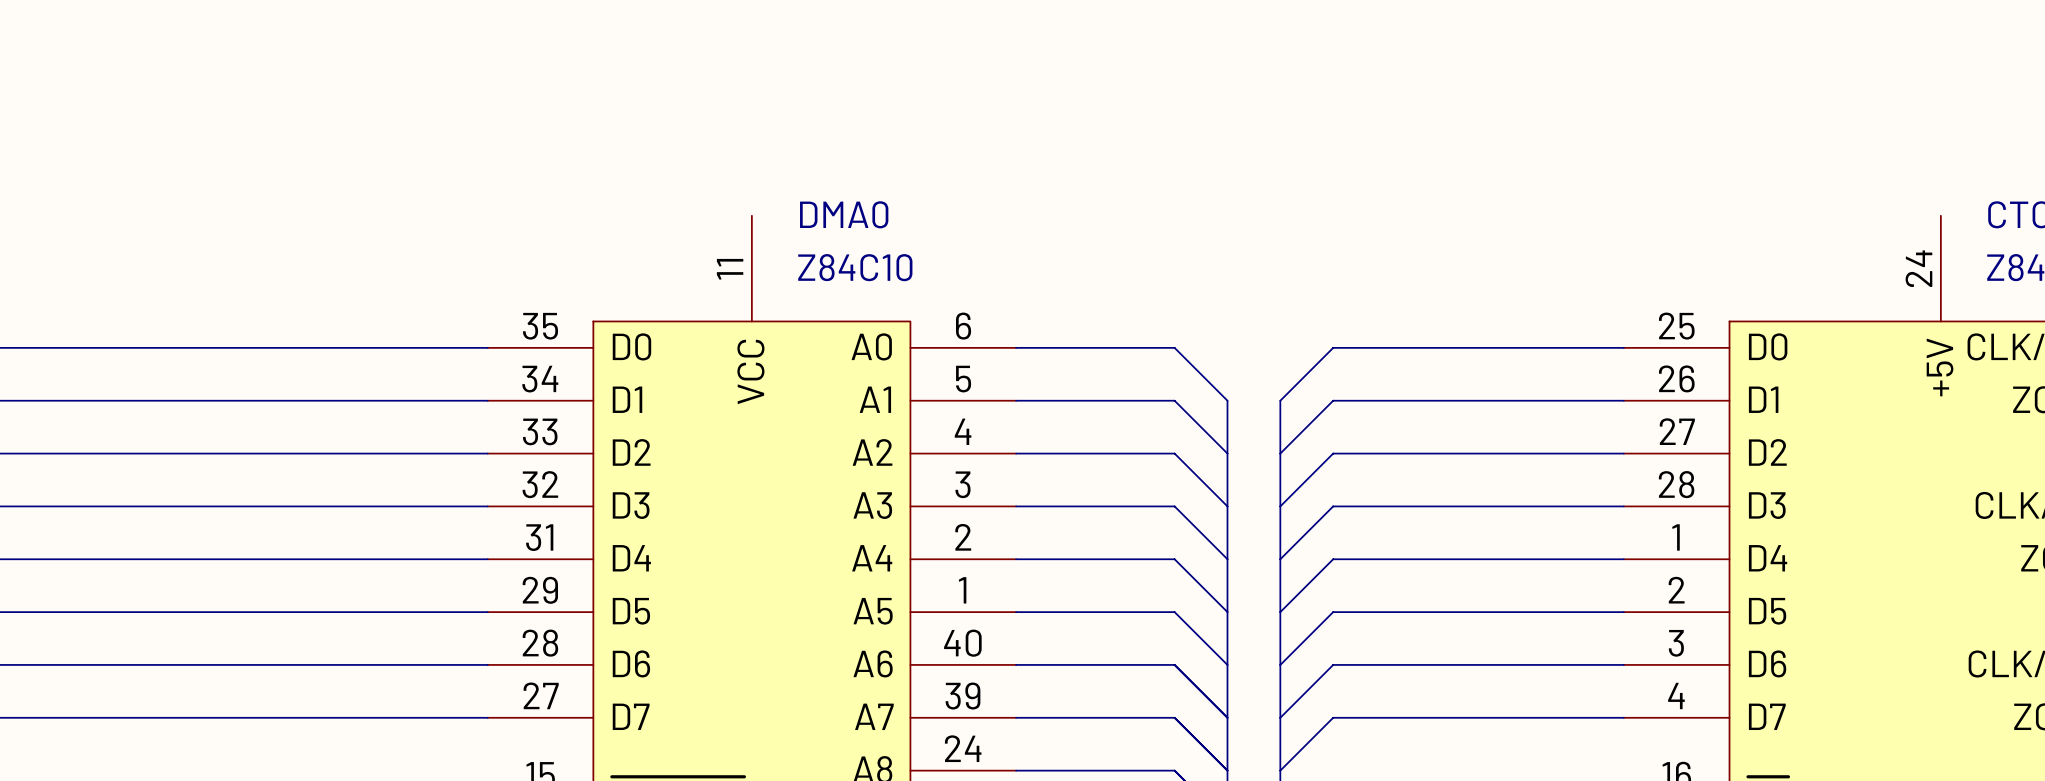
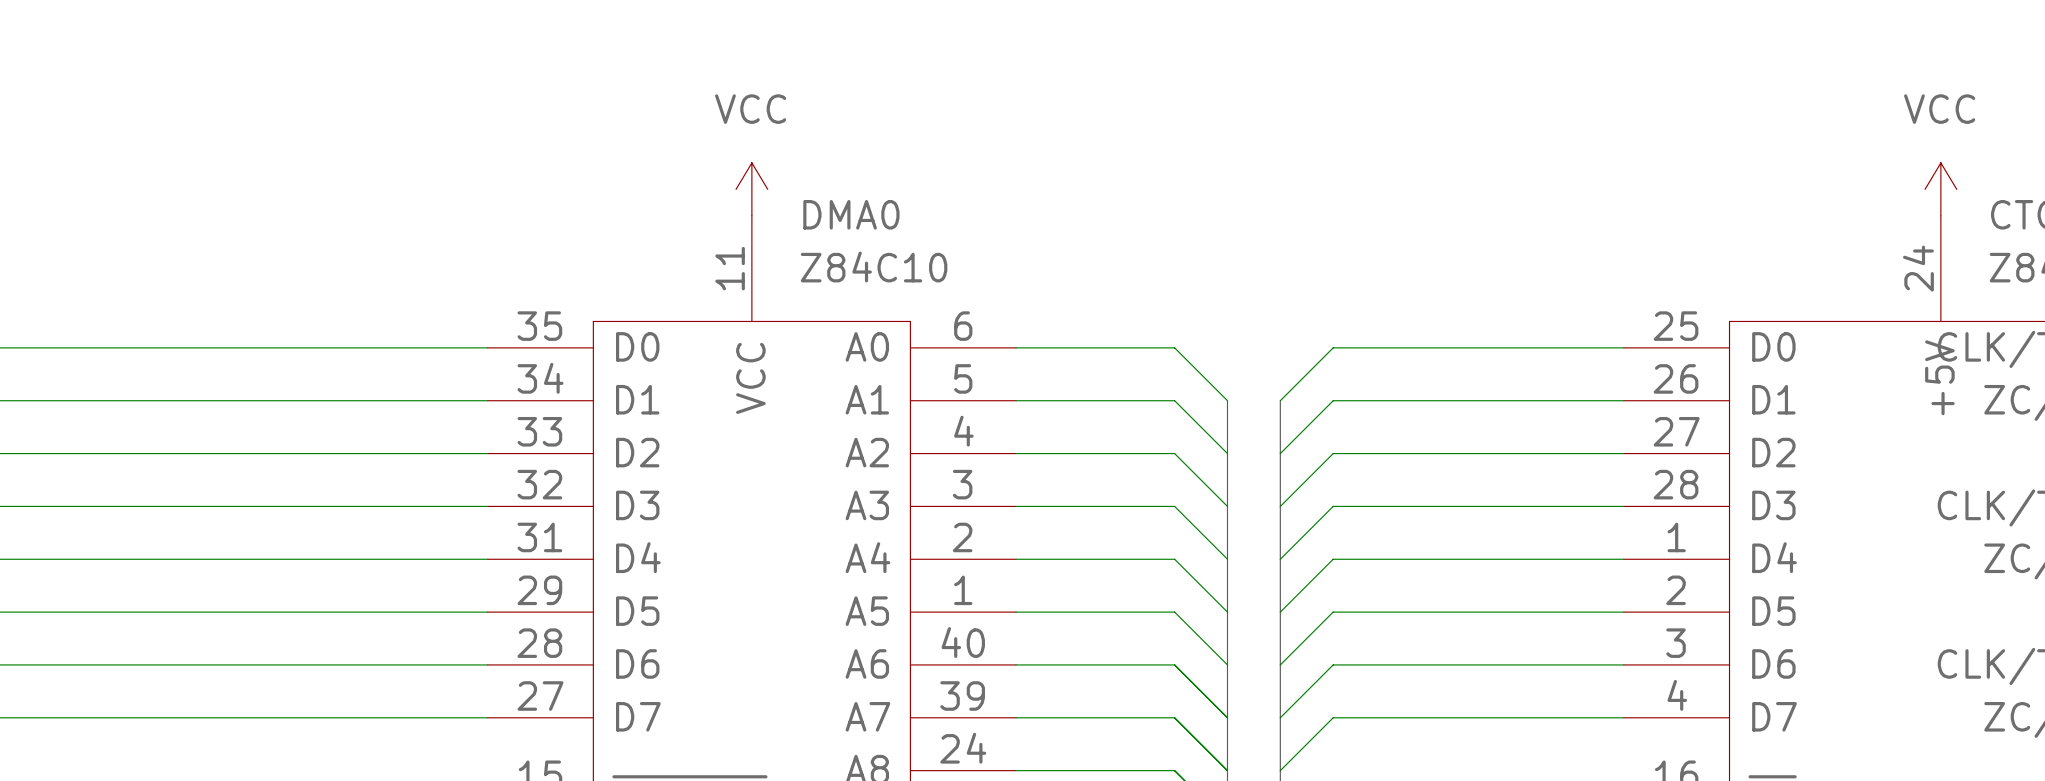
power symbol: none -> VCC (751, 189)
power symbol: none -> VCC (1940, 189)

